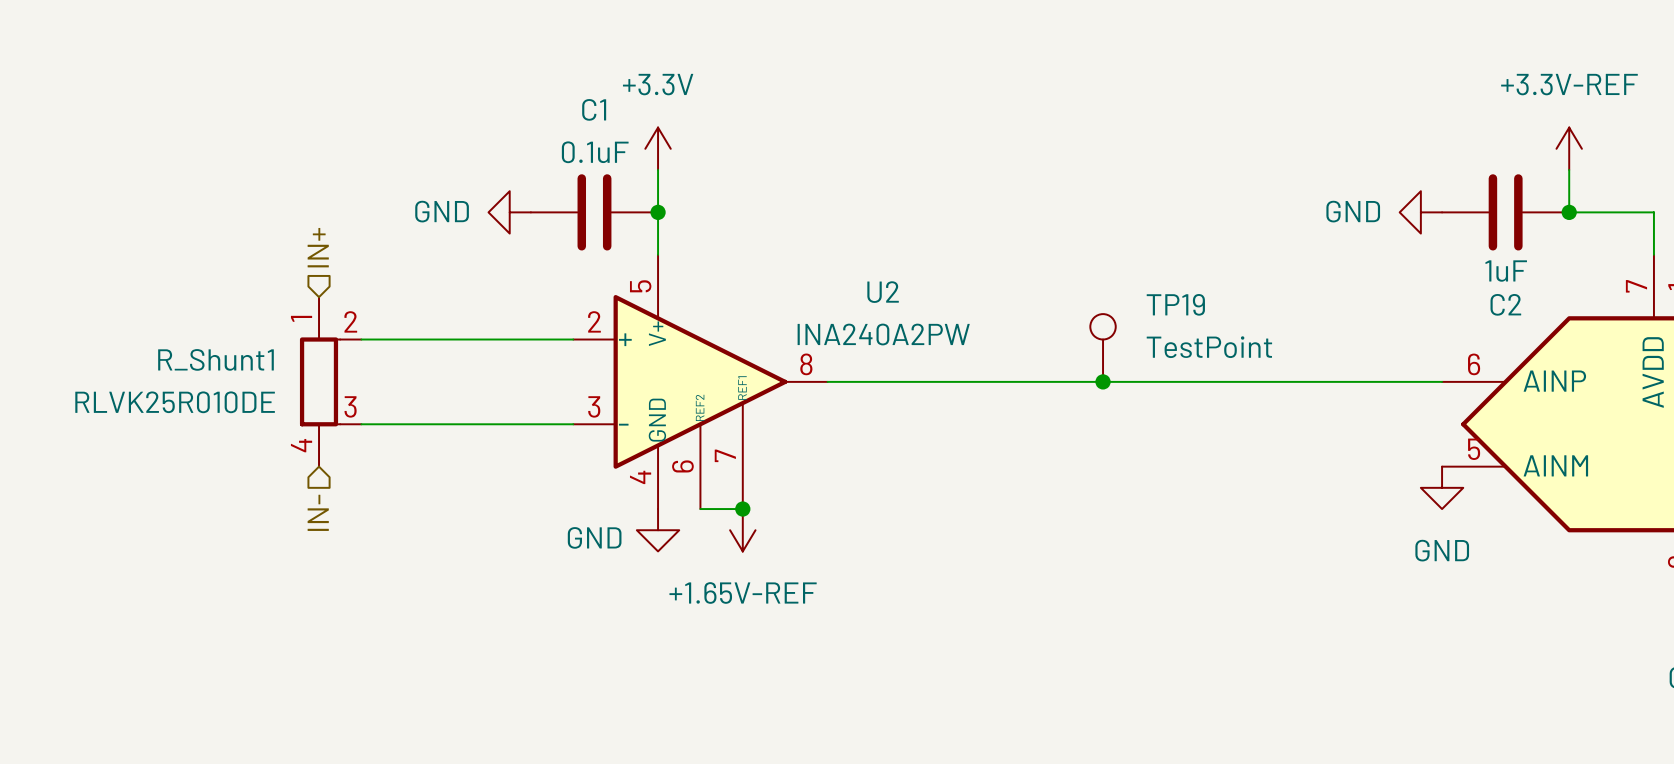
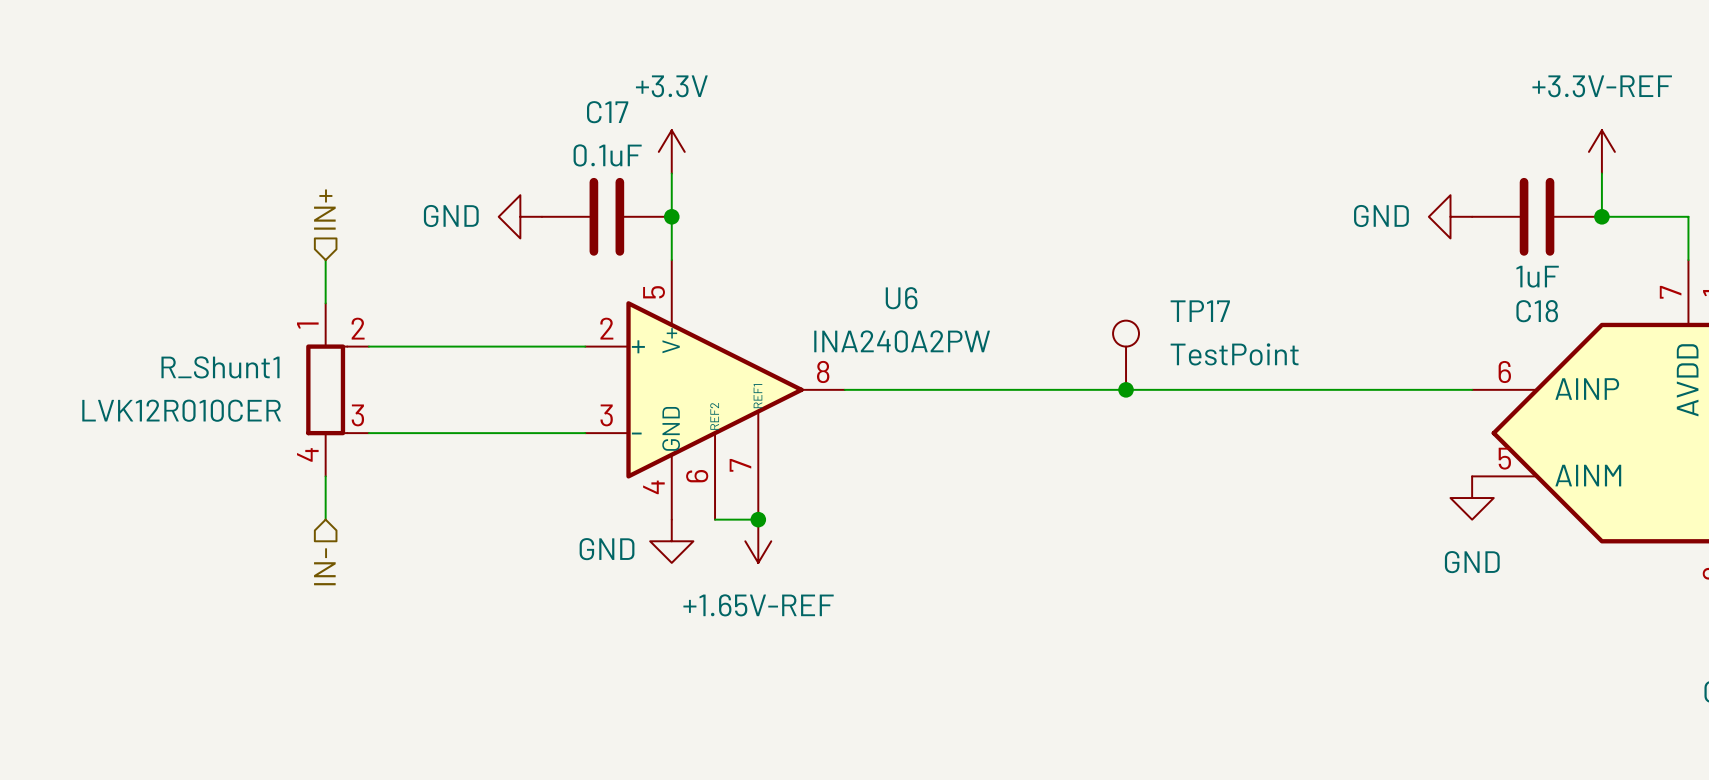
C1 name: C1 (594, 109) -> C17 (607, 112)
hierarchical label position: IN+ (318, 247) -> IN+ (324, 209)
wire: none -> (325, 260) (325, 303)
U2 name: U2 (883, 292) -> U6 (901, 298)
TP19 name: TP19 (1175, 304) -> TP17 (1200, 311)
C2 name: C2 (1505, 304) -> C18 (1537, 311)
R_Shunt1 value: RLVK25R010DE (175, 402) -> LVK12R010CER (181, 410)
wire: none -> (325, 476) (325, 519)
hierarchical label position: IN- (318, 512) -> IN- (324, 566)

